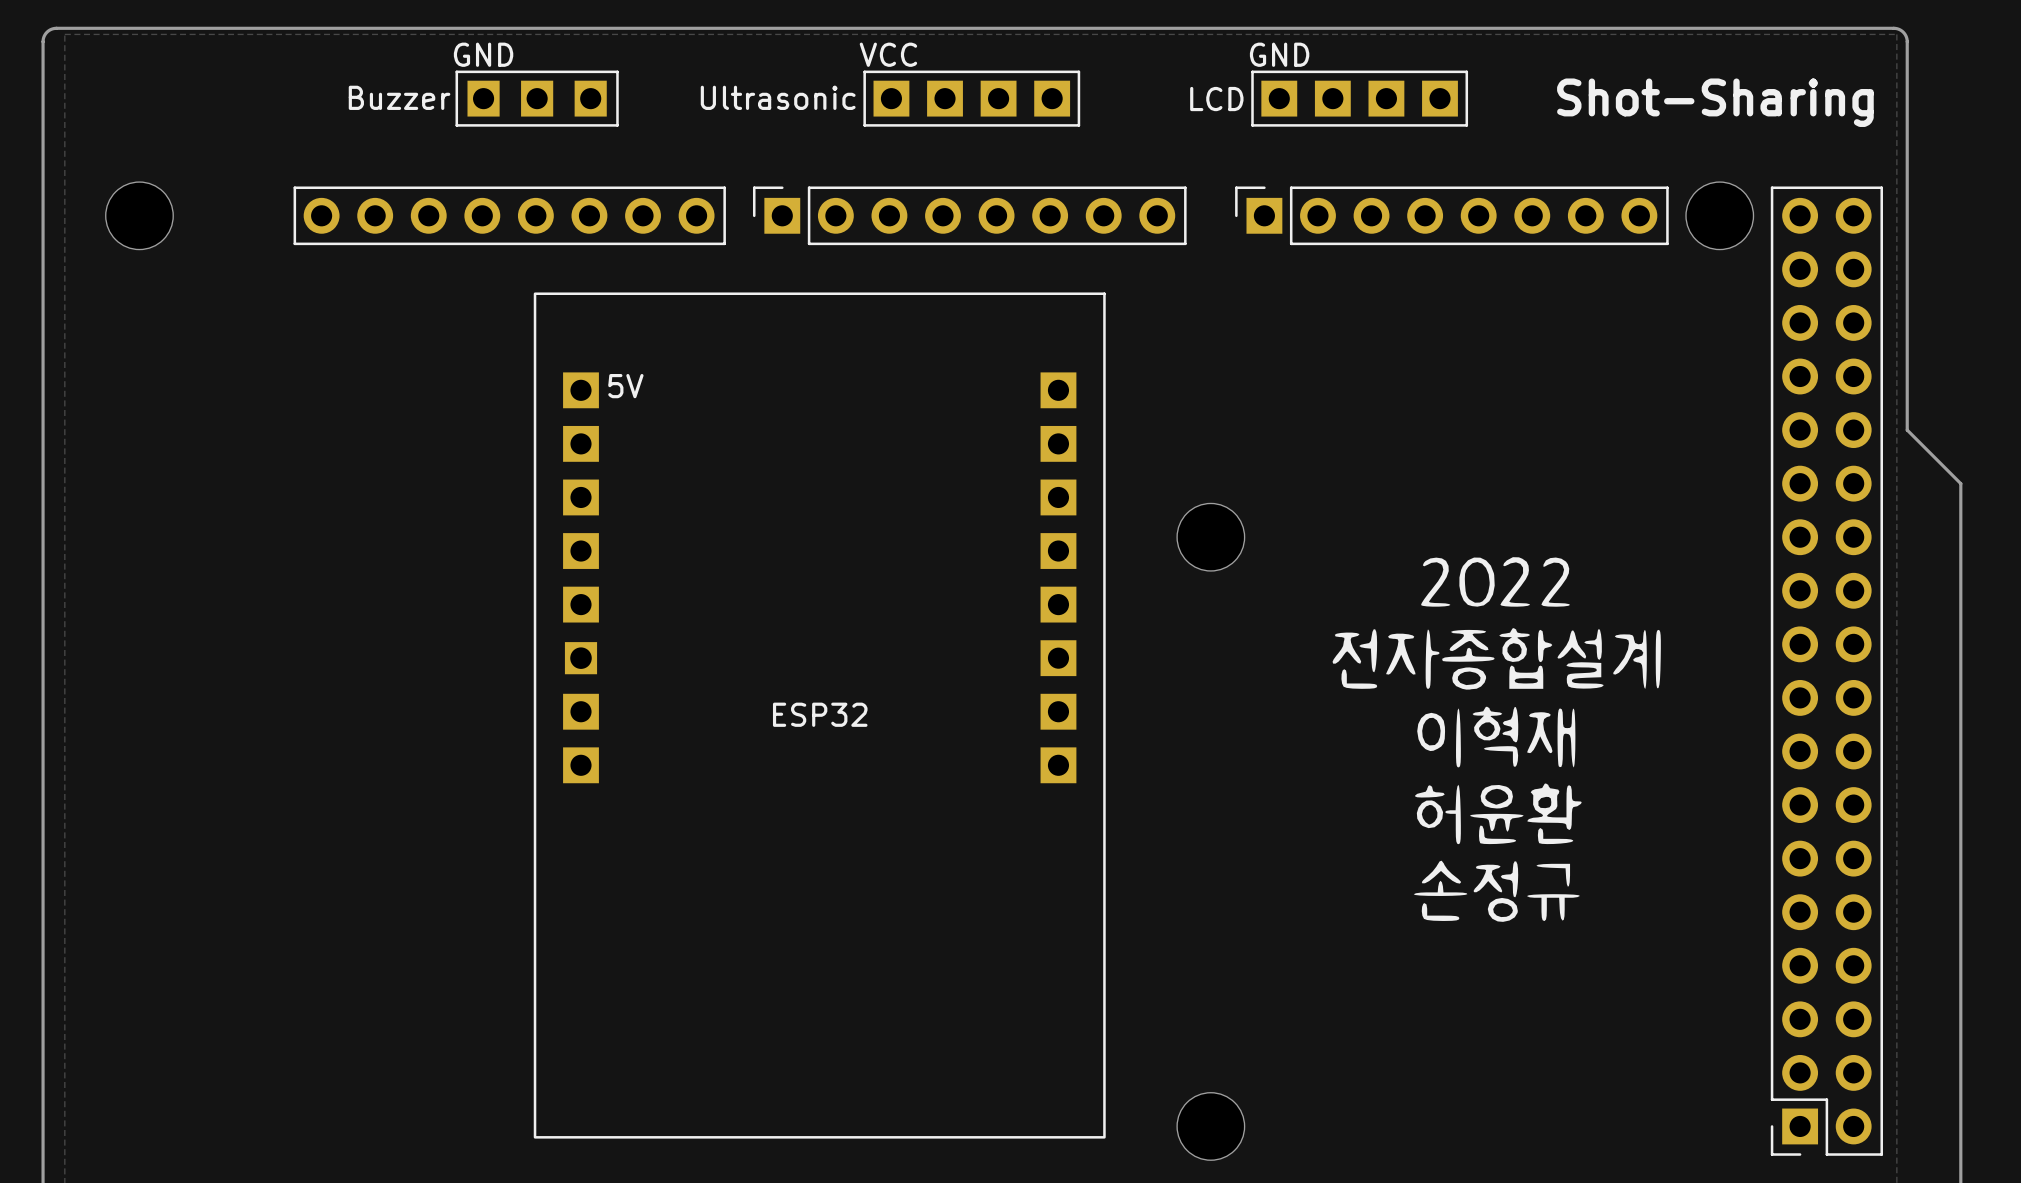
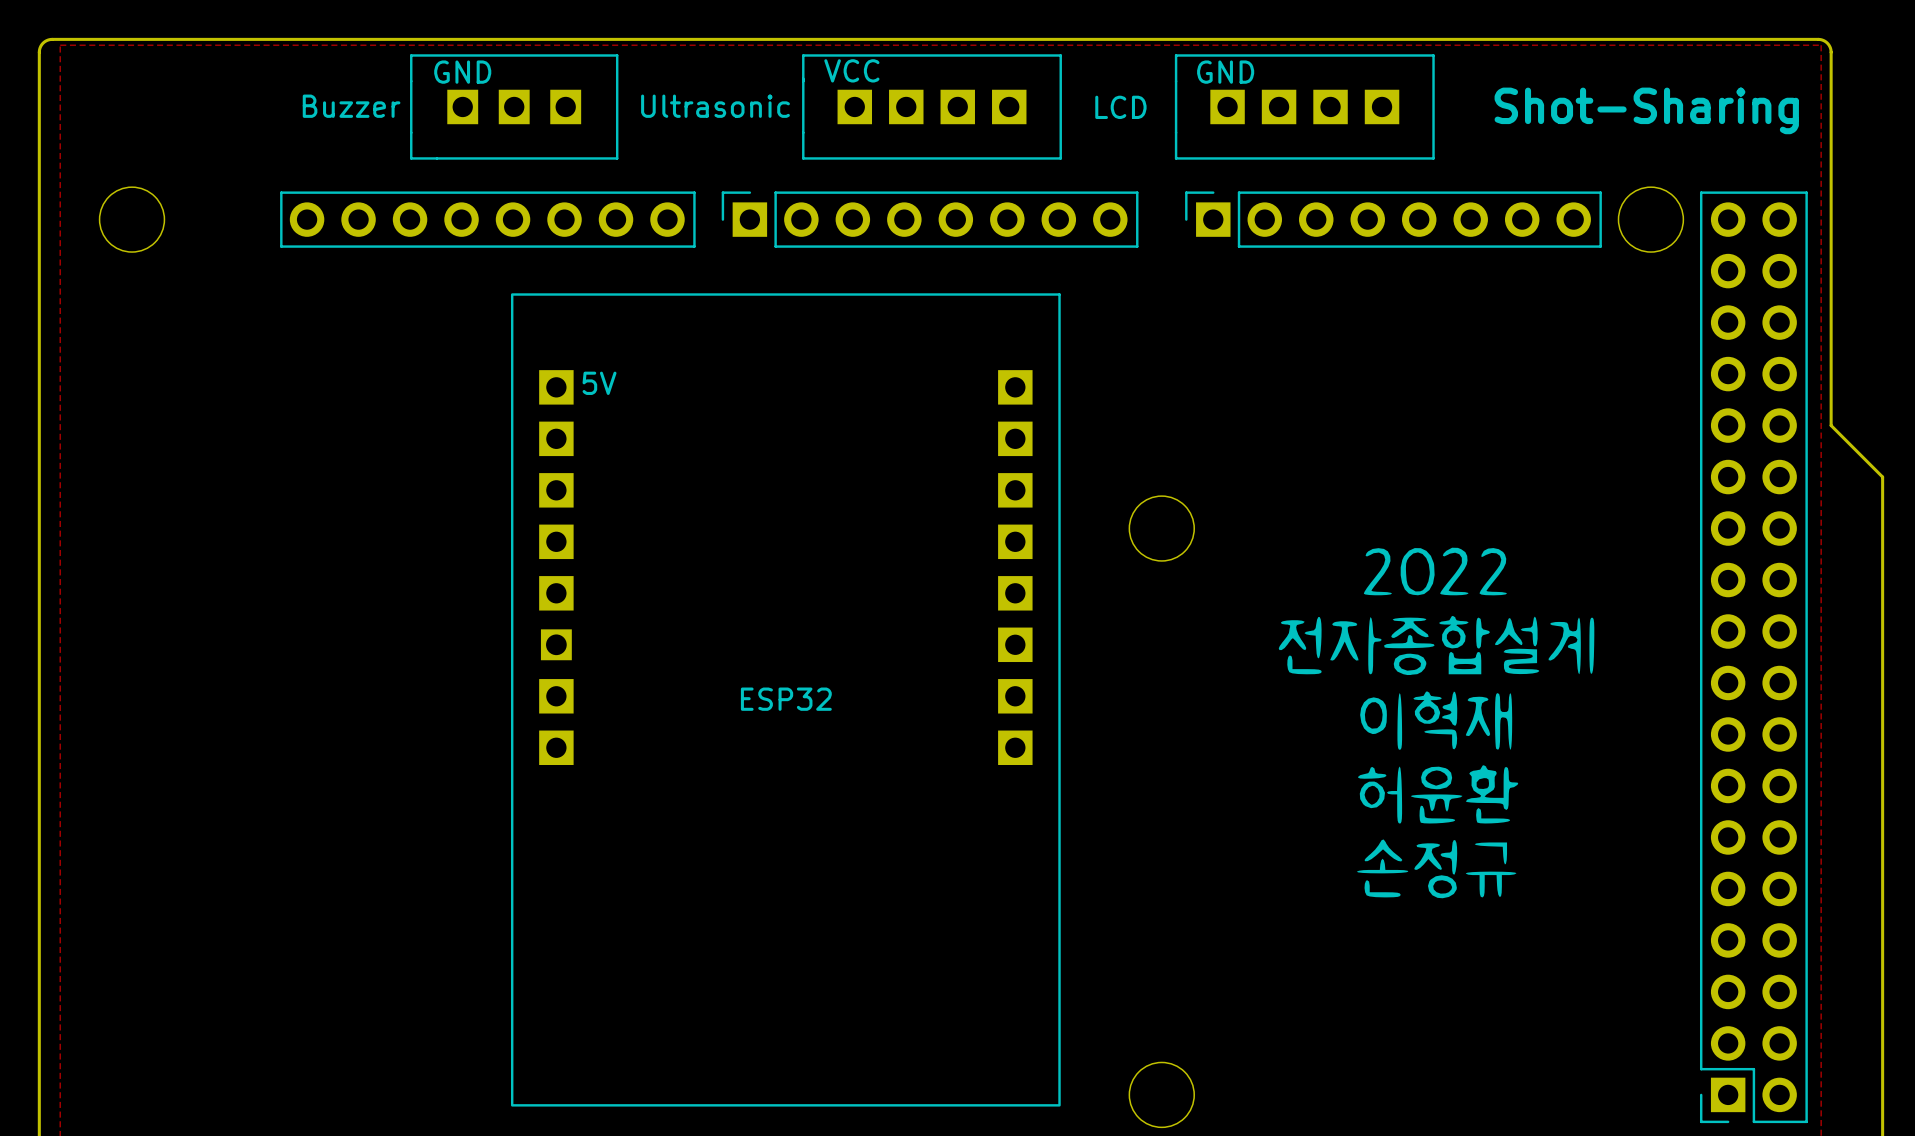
part footprint: [455, 70, 619, 127] -> [410, 54, 619, 160]
part footprint: [863, 70, 1081, 127] -> [802, 54, 1062, 160]
part footprint: [1251, 70, 1469, 127] -> [1174, 54, 1435, 160]
part value position: LCD (1216, 99) -> LCD (1120, 107)

